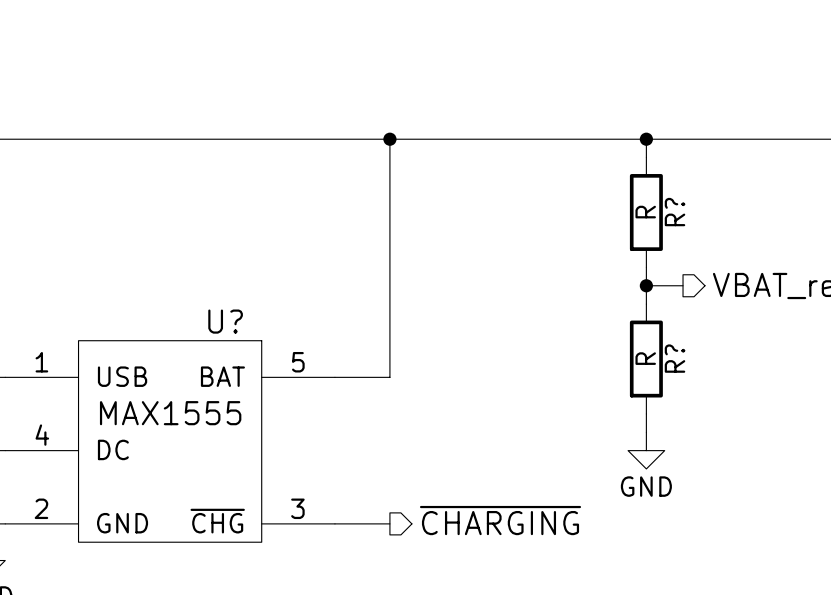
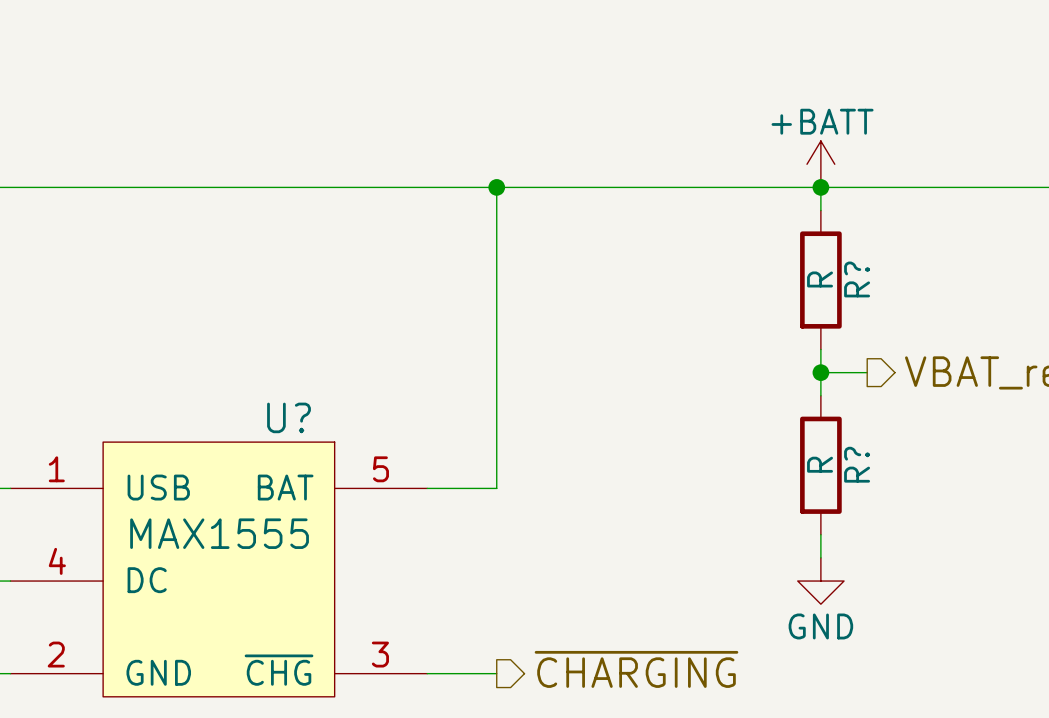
power symbol: none -> +BATT (820, 164)

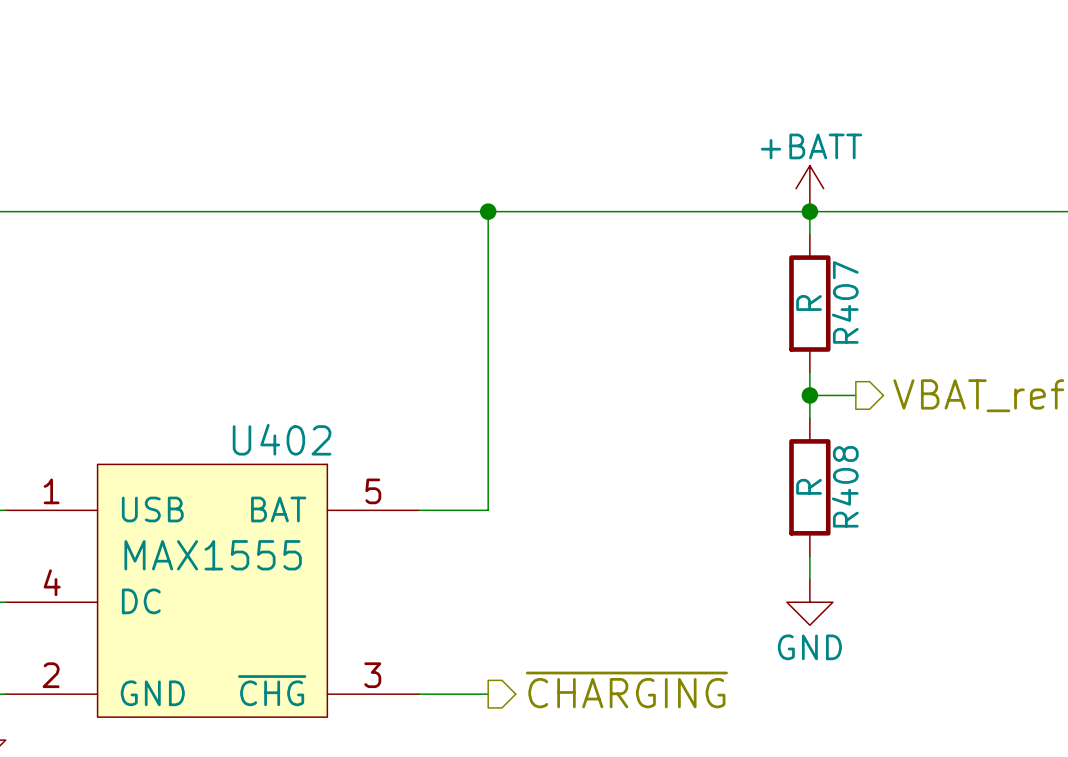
R? name: R? (857, 279) -> R407 (845, 302)
U? name: U? (289, 417) -> U402 (282, 439)
R? name: R? (857, 464) -> R408 (845, 486)

